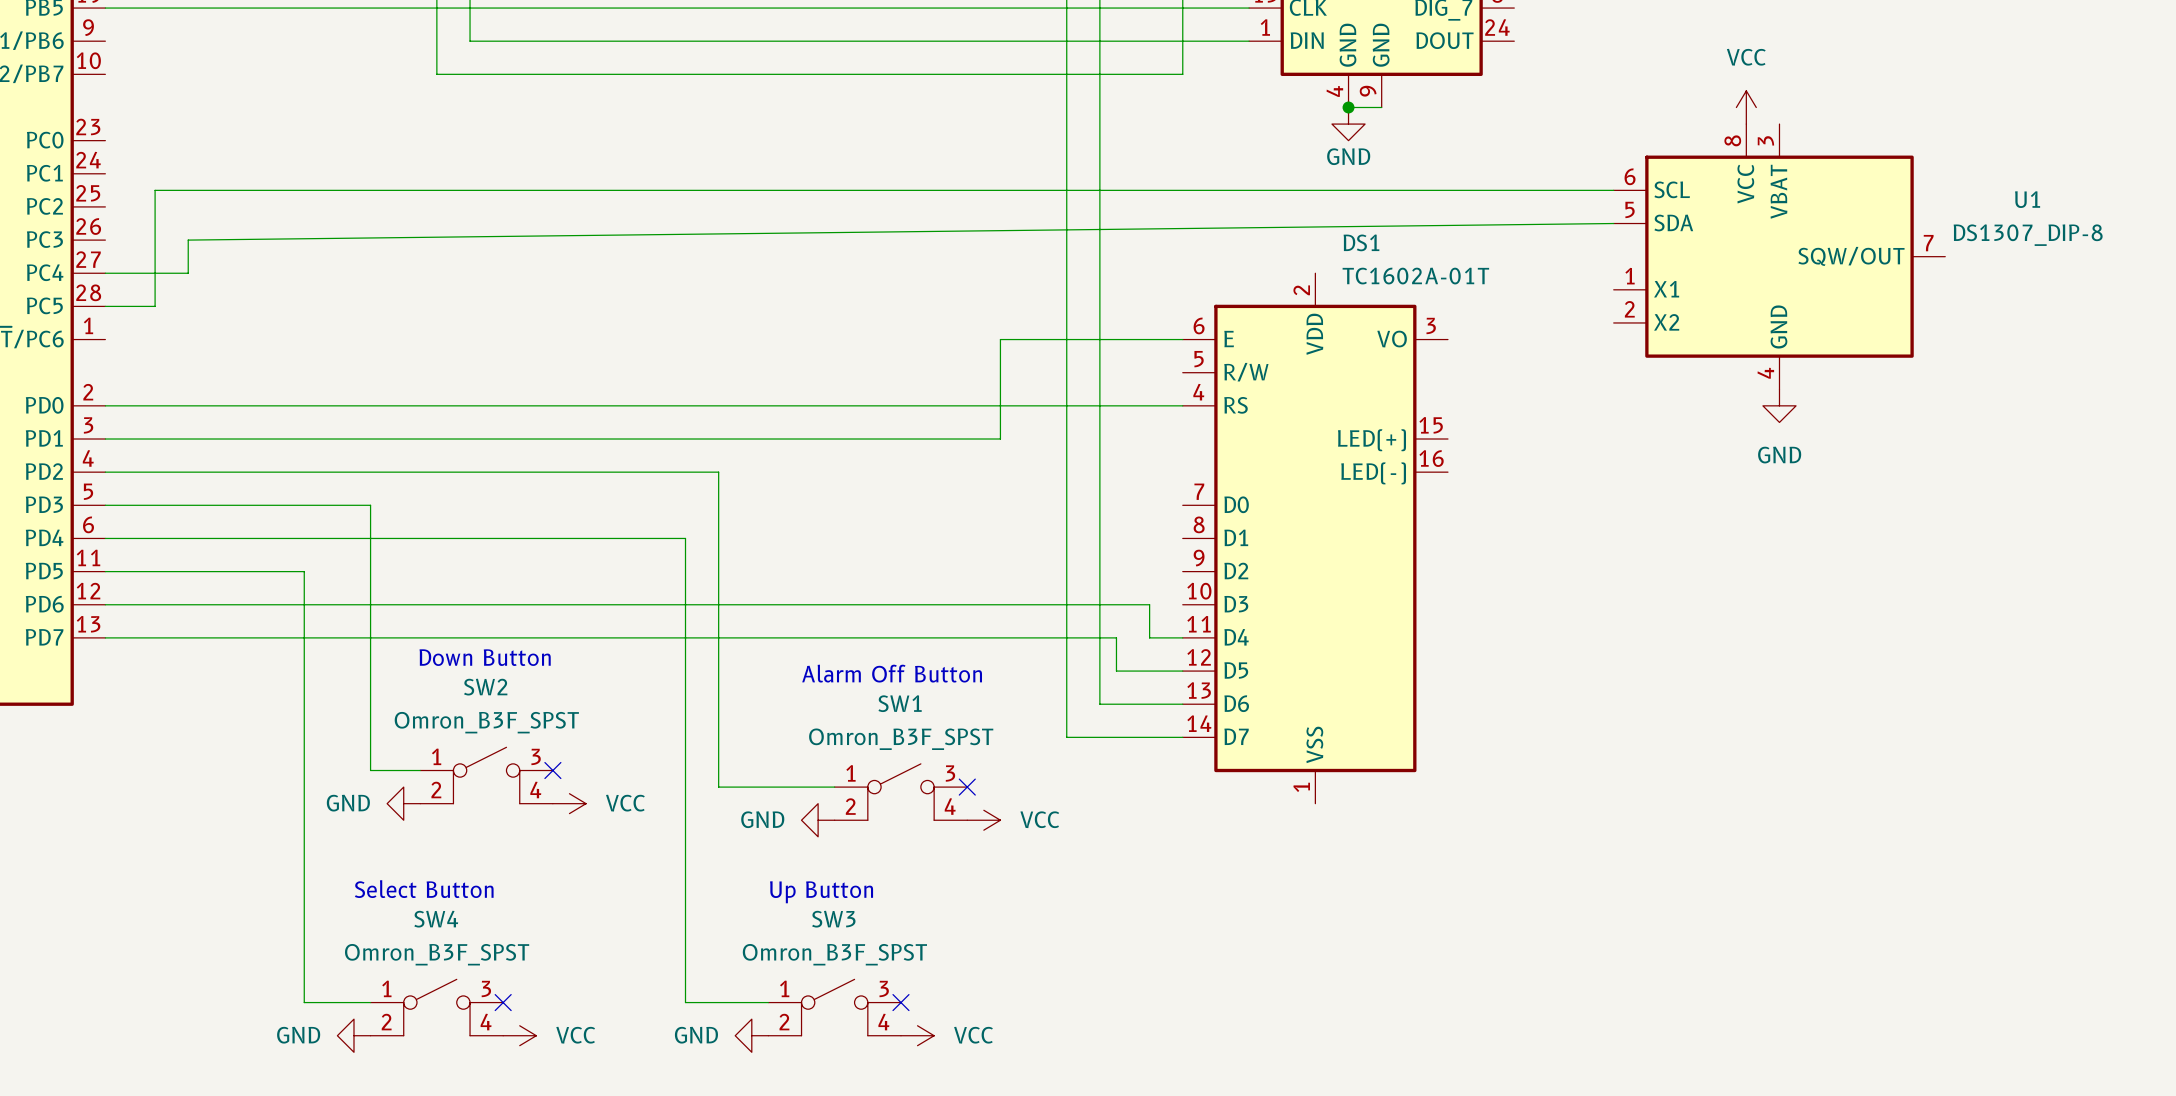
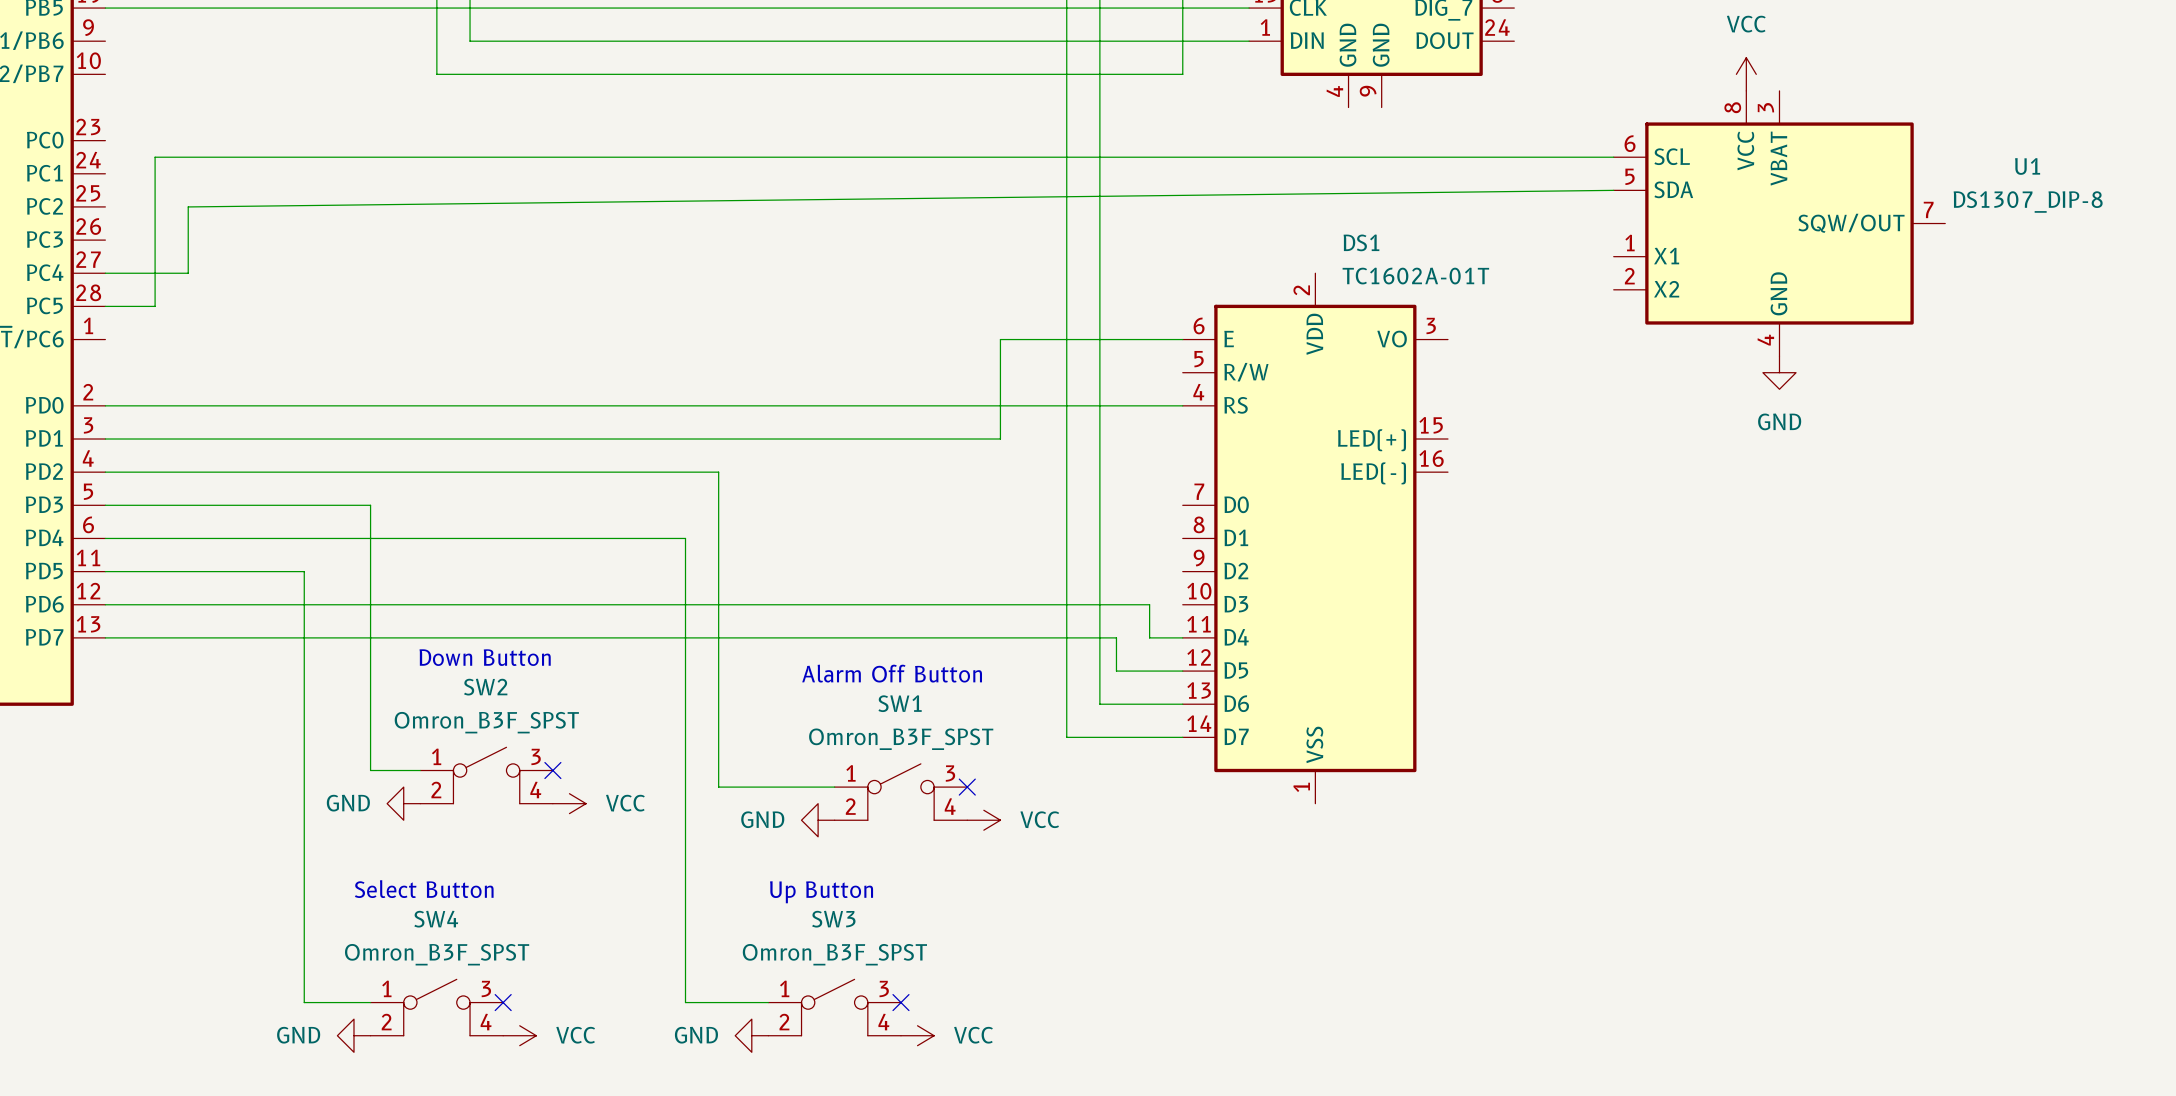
wire: (1348, 107) (1381, 107) -> none
junction: (1348, 107) -> none
power symbol position: VCC (1746, 107) -> VCC (1746, 74)
power symbol: GND (1348, 124) -> none
wire: (155, 190) (1613, 190) -> (155, 190) (155, 157) (1613, 157)
wire: (1613, 223) (188, 240) -> (1613, 190) (188, 206) (188, 240)
U1 position: (1779, 256) -> (1779, 223)
power symbol position: GND (1779, 405) -> GND (1779, 372)

